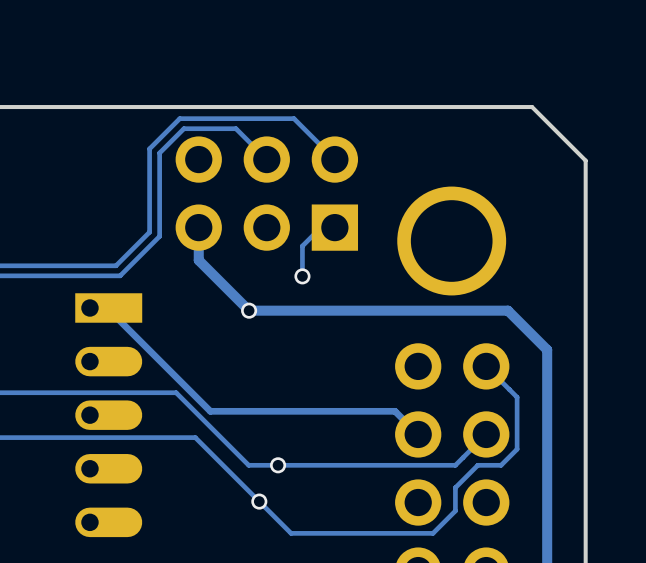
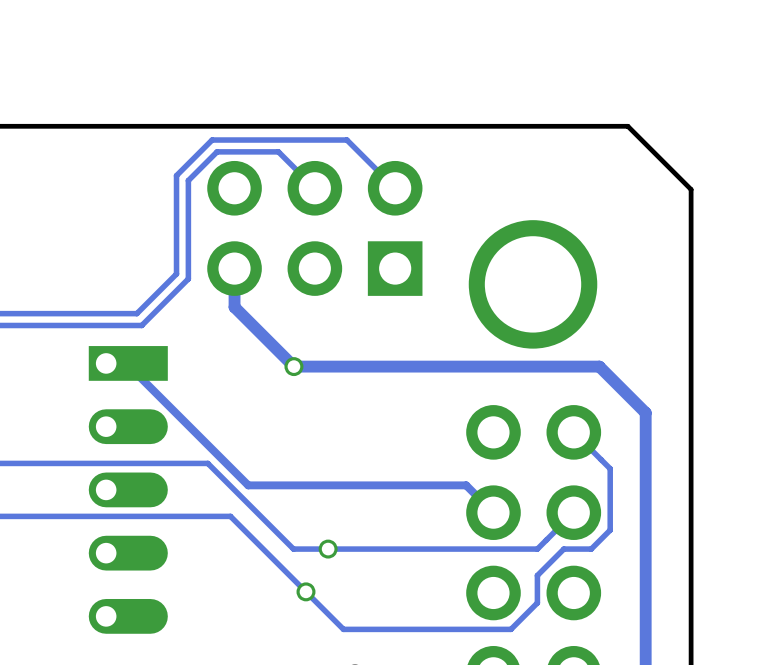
track: (334, 227) (320, 227) (302, 246) (302, 276) -> none
via: (302, 276) -> none

